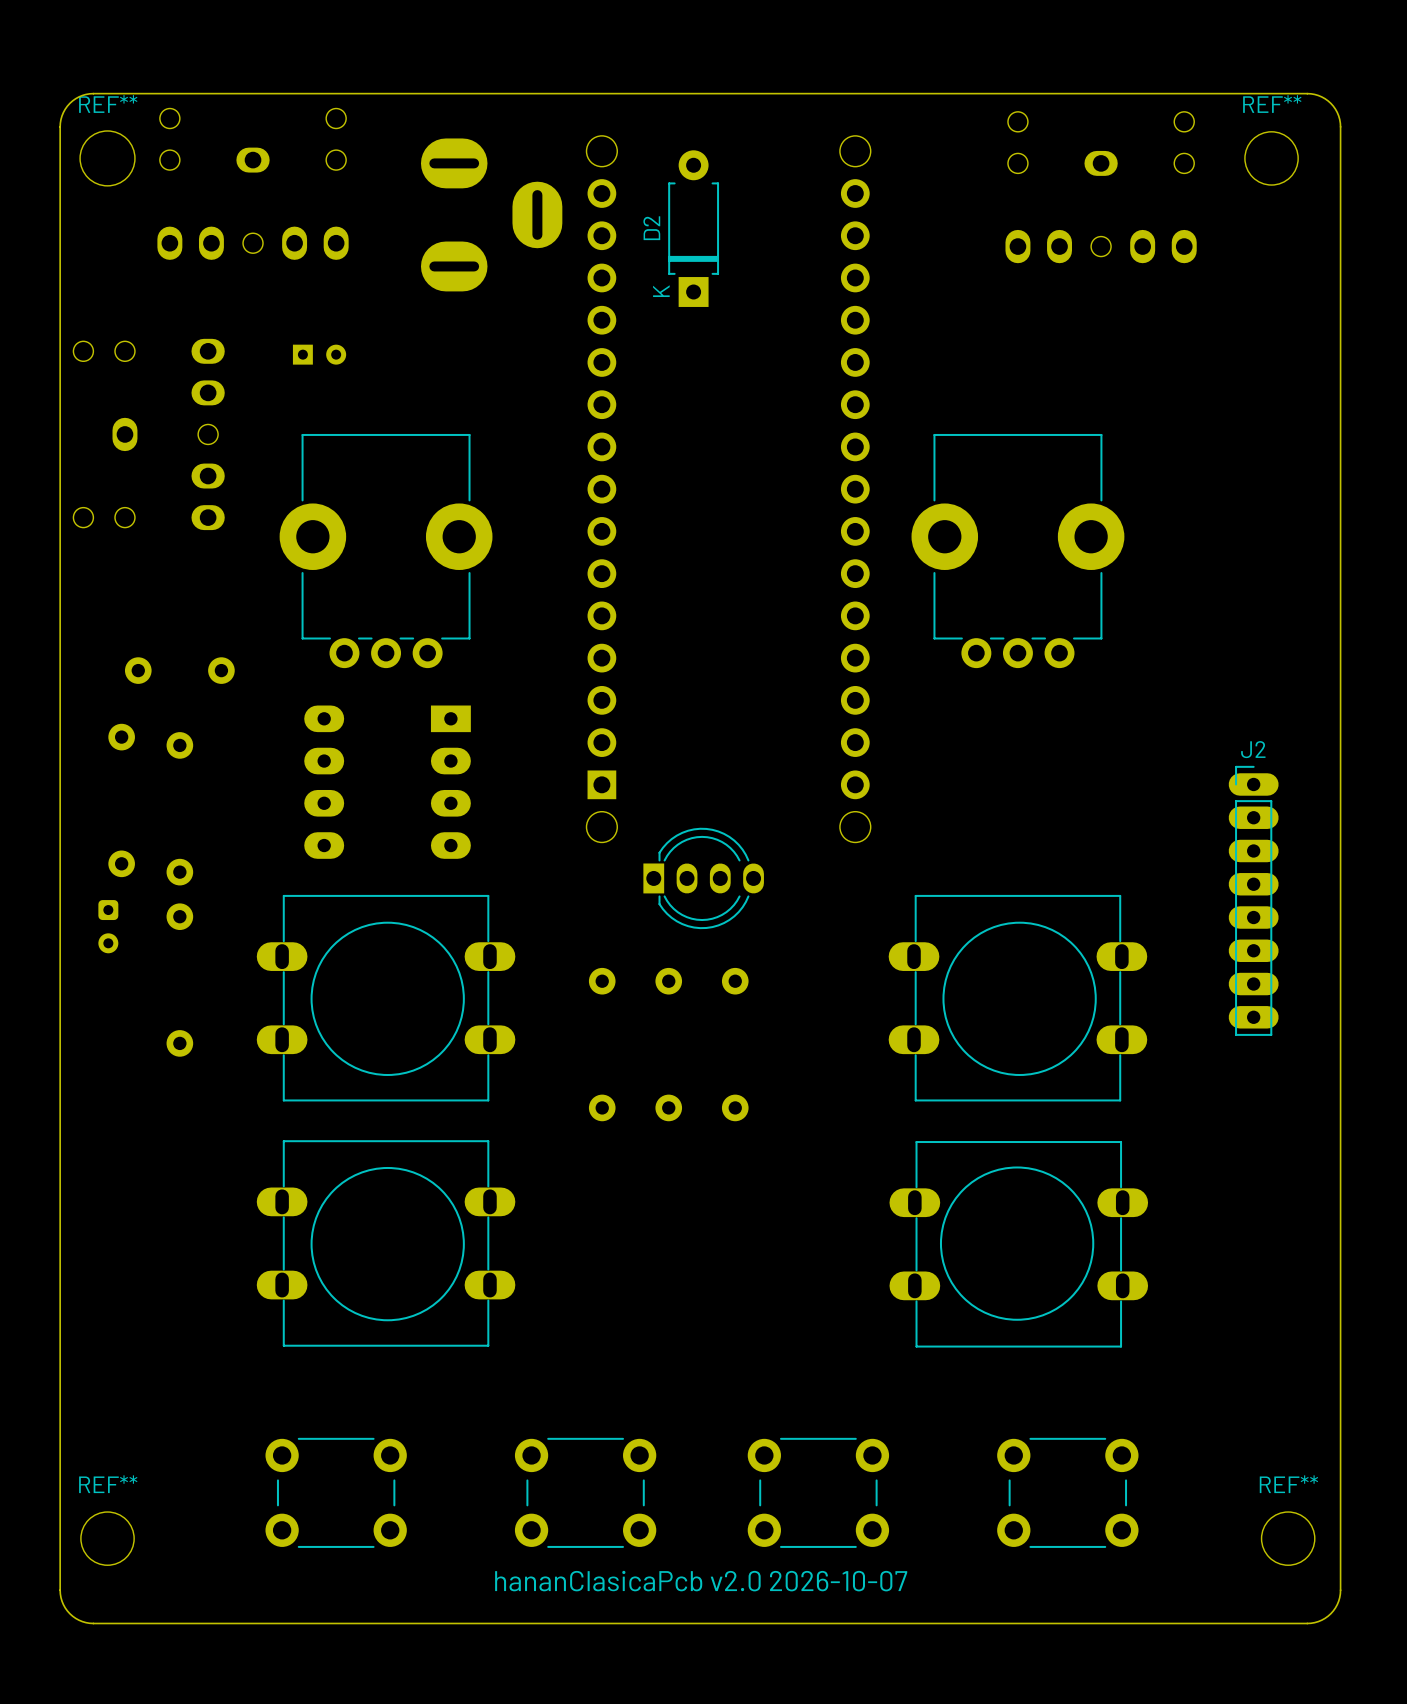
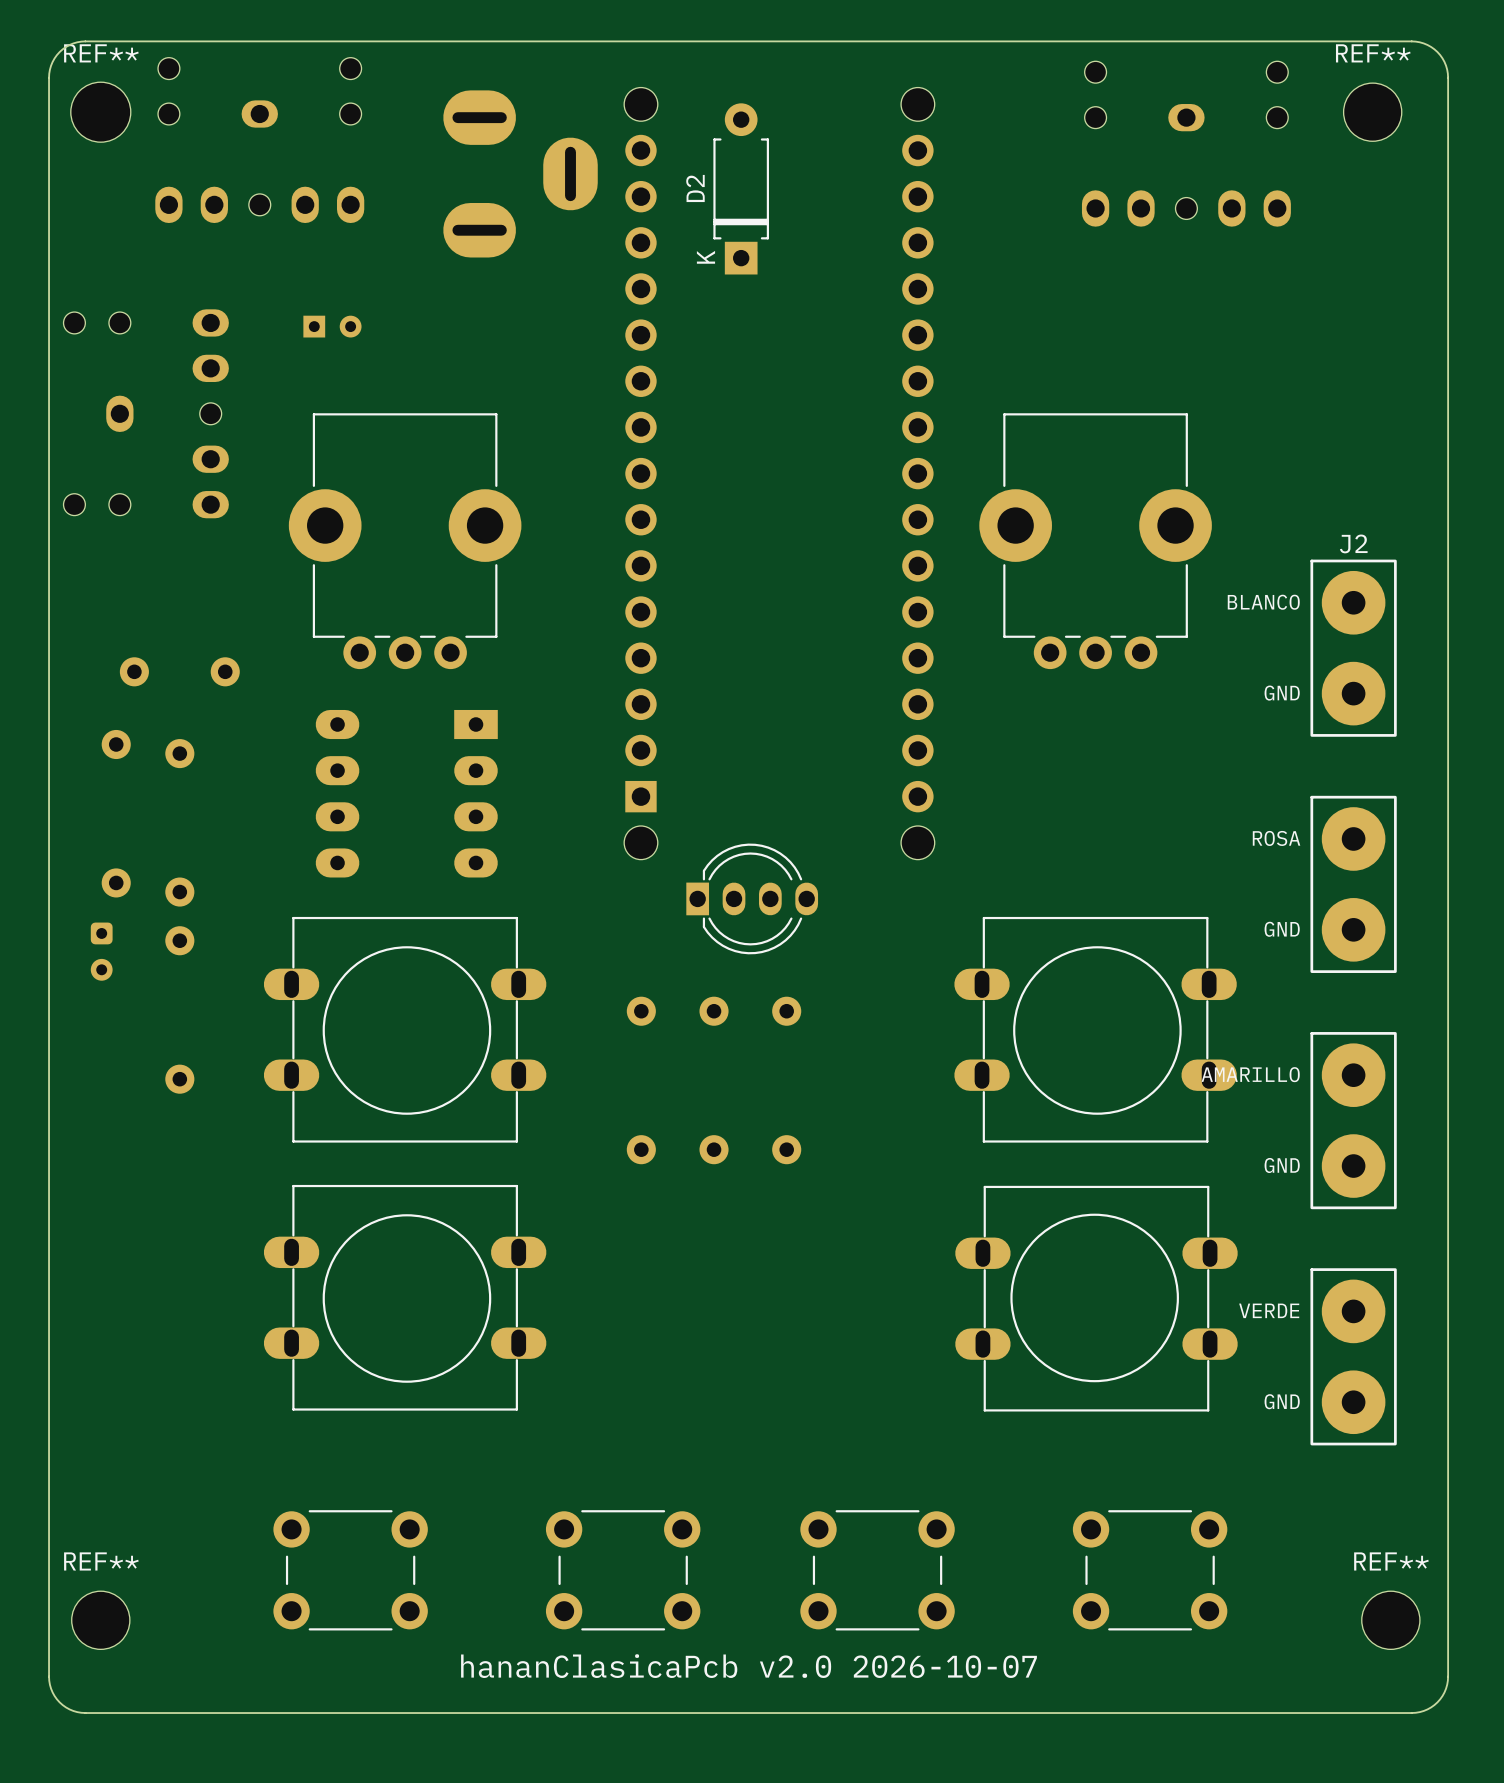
J2 name position: J2 (1253, 749) -> J2 (1353, 543)
J2 footprint: [1228, 765, 1279, 1036] -> [1310, 559, 1397, 1446]

